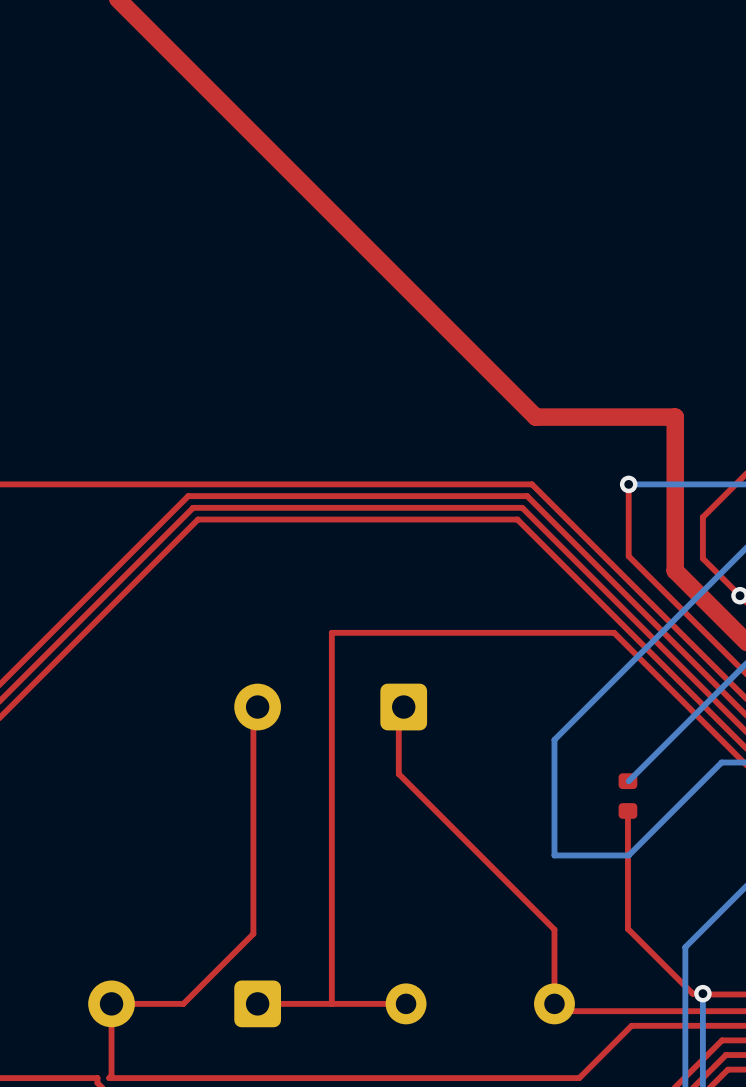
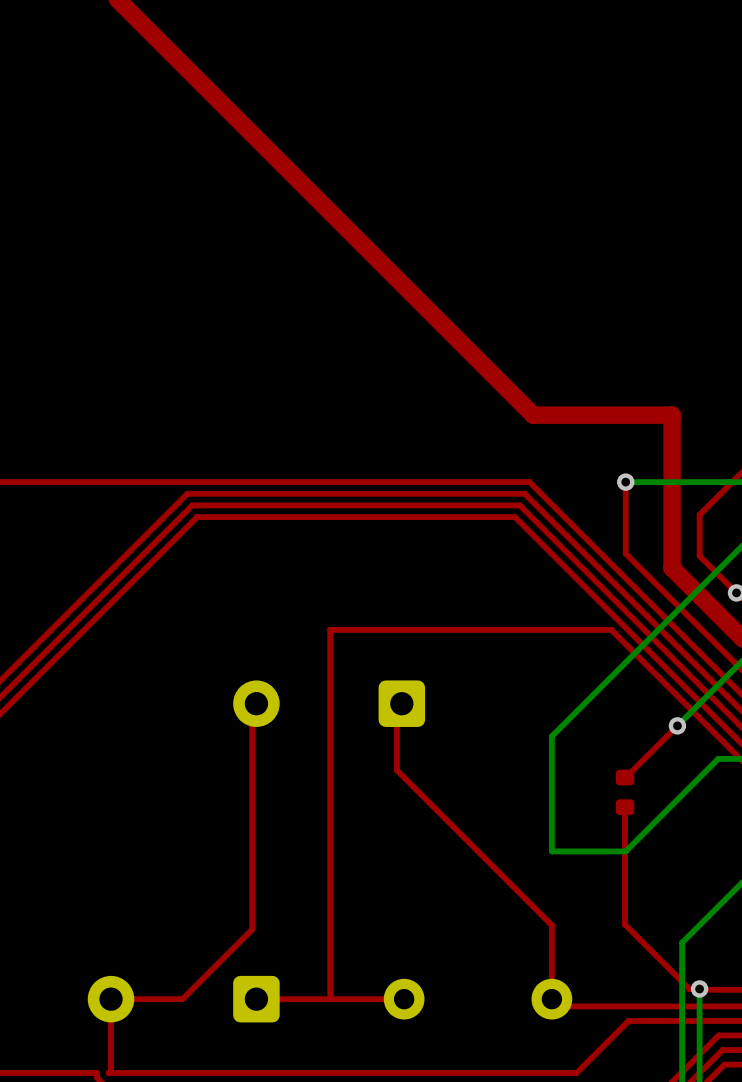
top track: none -> (677, 725) (625, 777)
bottom track: (680, 729) (628, 781) -> none
via: none -> (677, 725)

